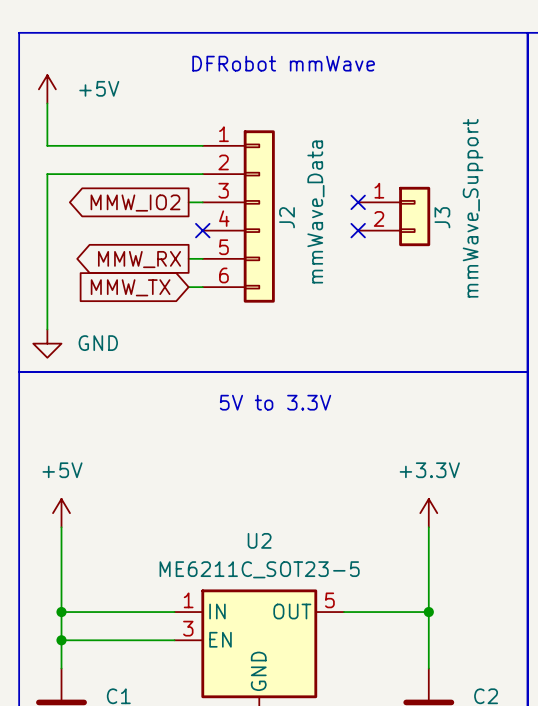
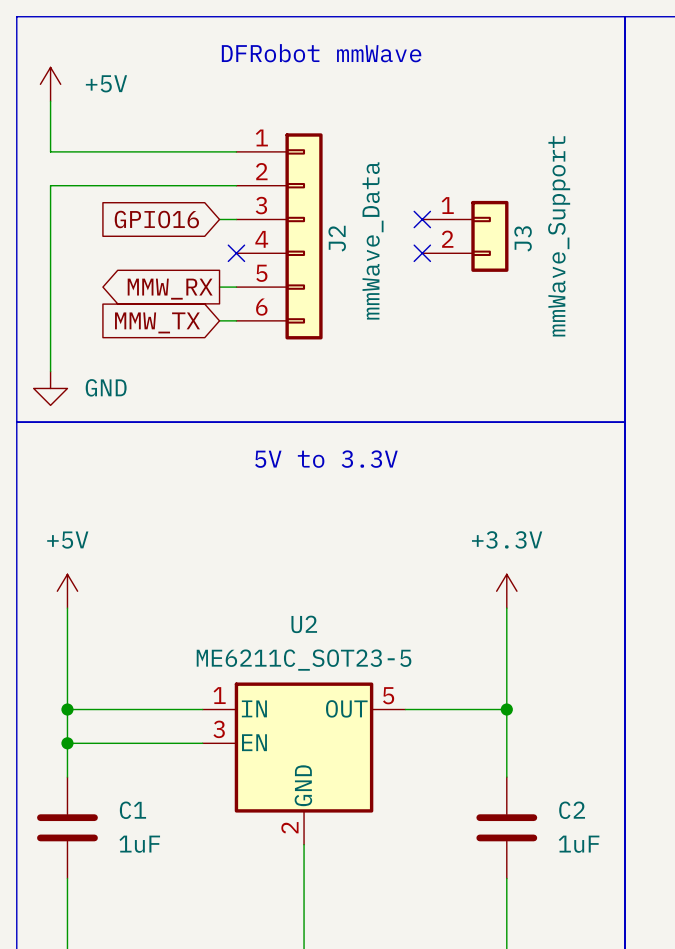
global label shape: output (135, 203) -> input (156, 219)
global label: MMW_IO2 (135, 203) -> GPIO16 (156, 219)

